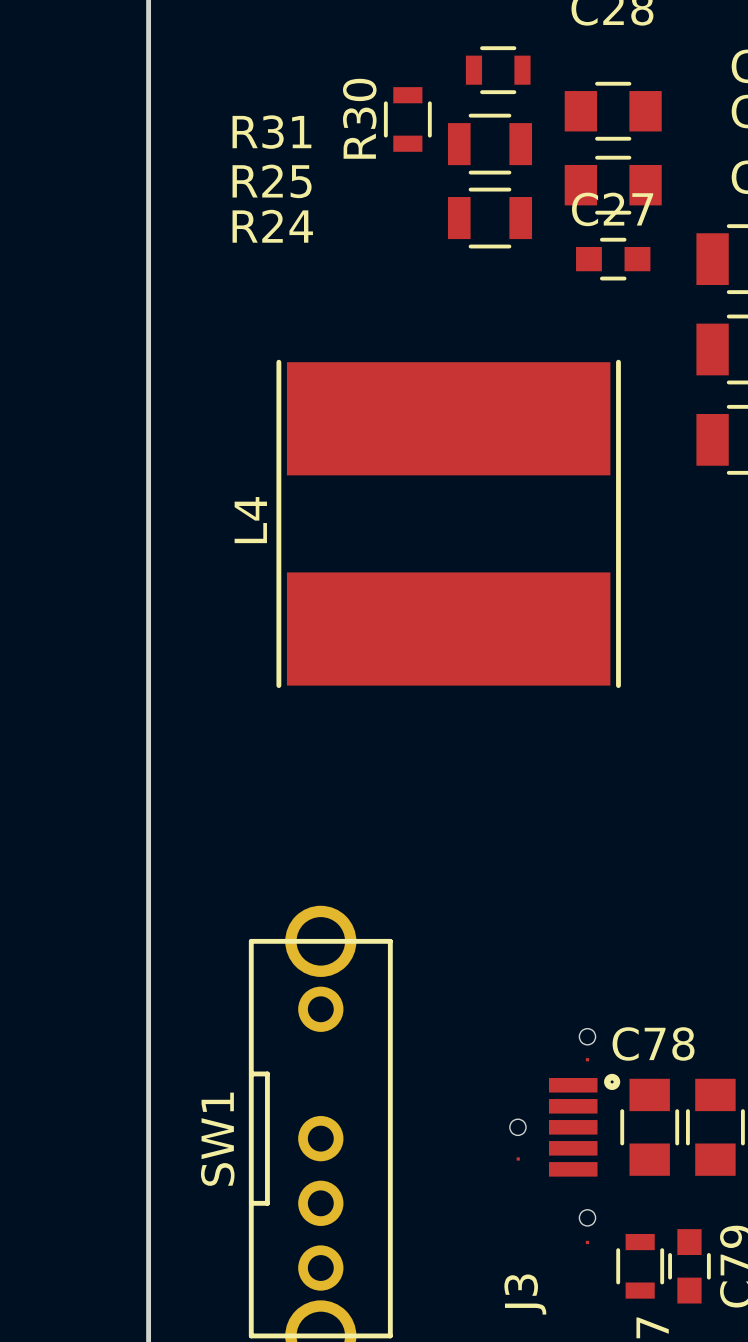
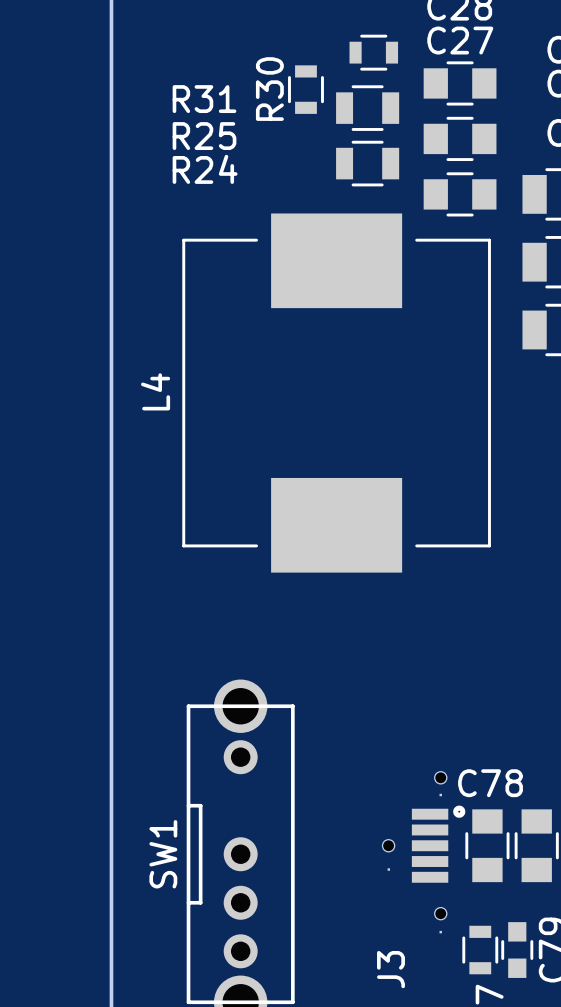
C27 name position: C27 (612, 209) -> C27 (460, 40)
C27 footprint: [576, 237, 651, 281] -> [423, 172, 497, 217]
L4 footprint: [276, 359, 621, 689] -> [182, 213, 491, 573]

